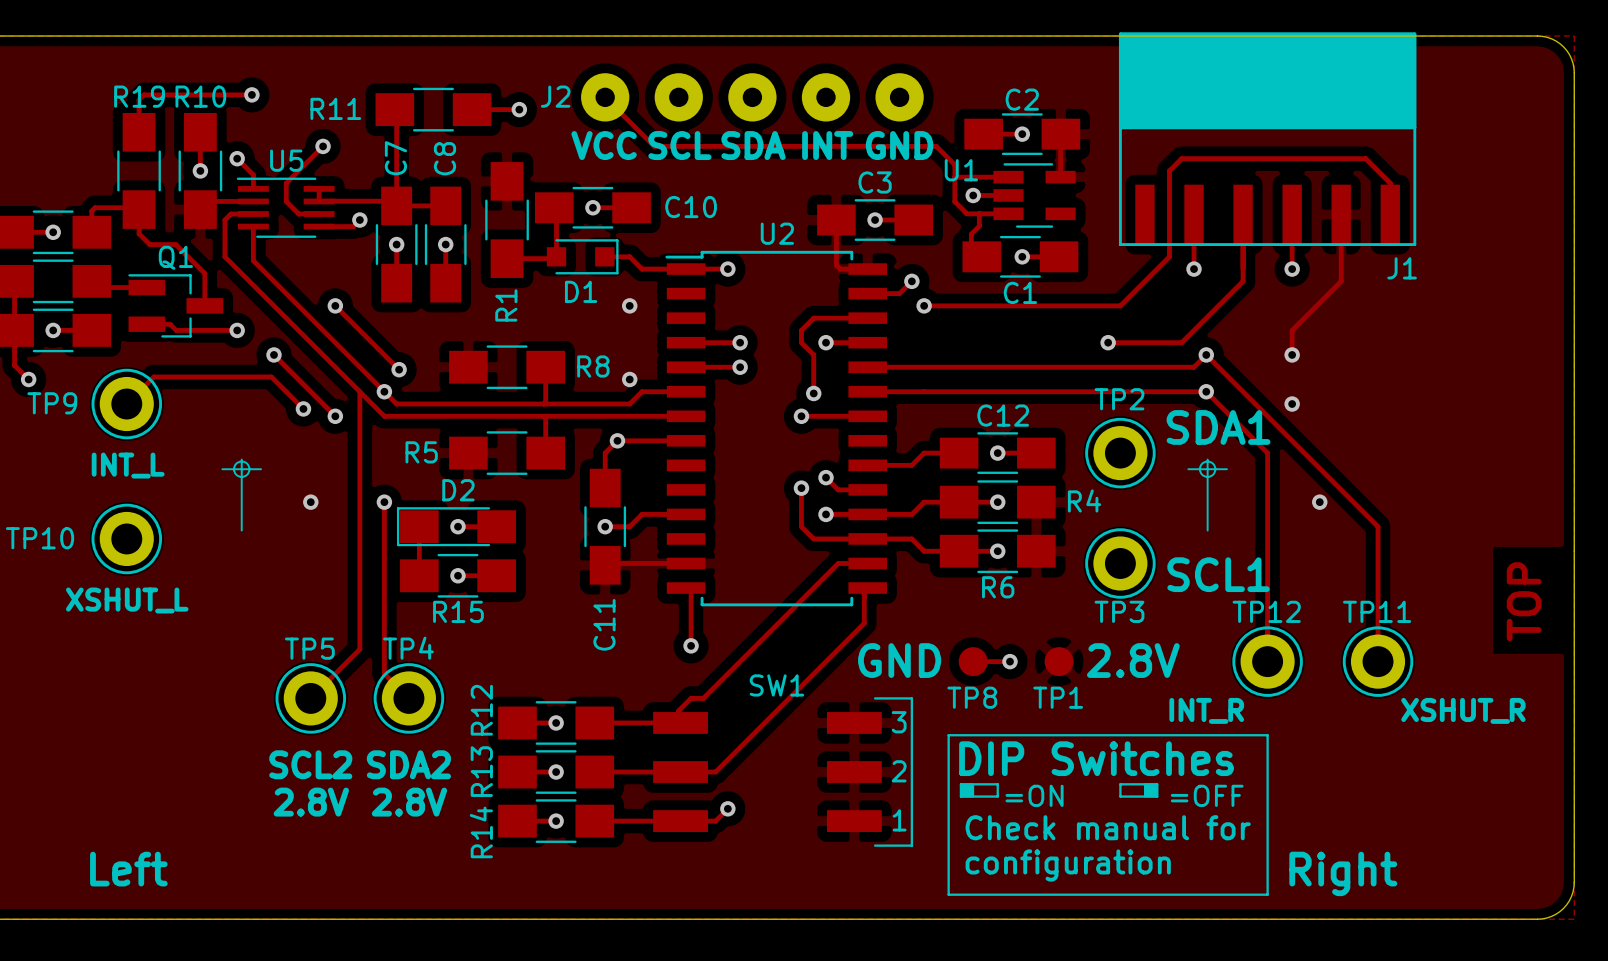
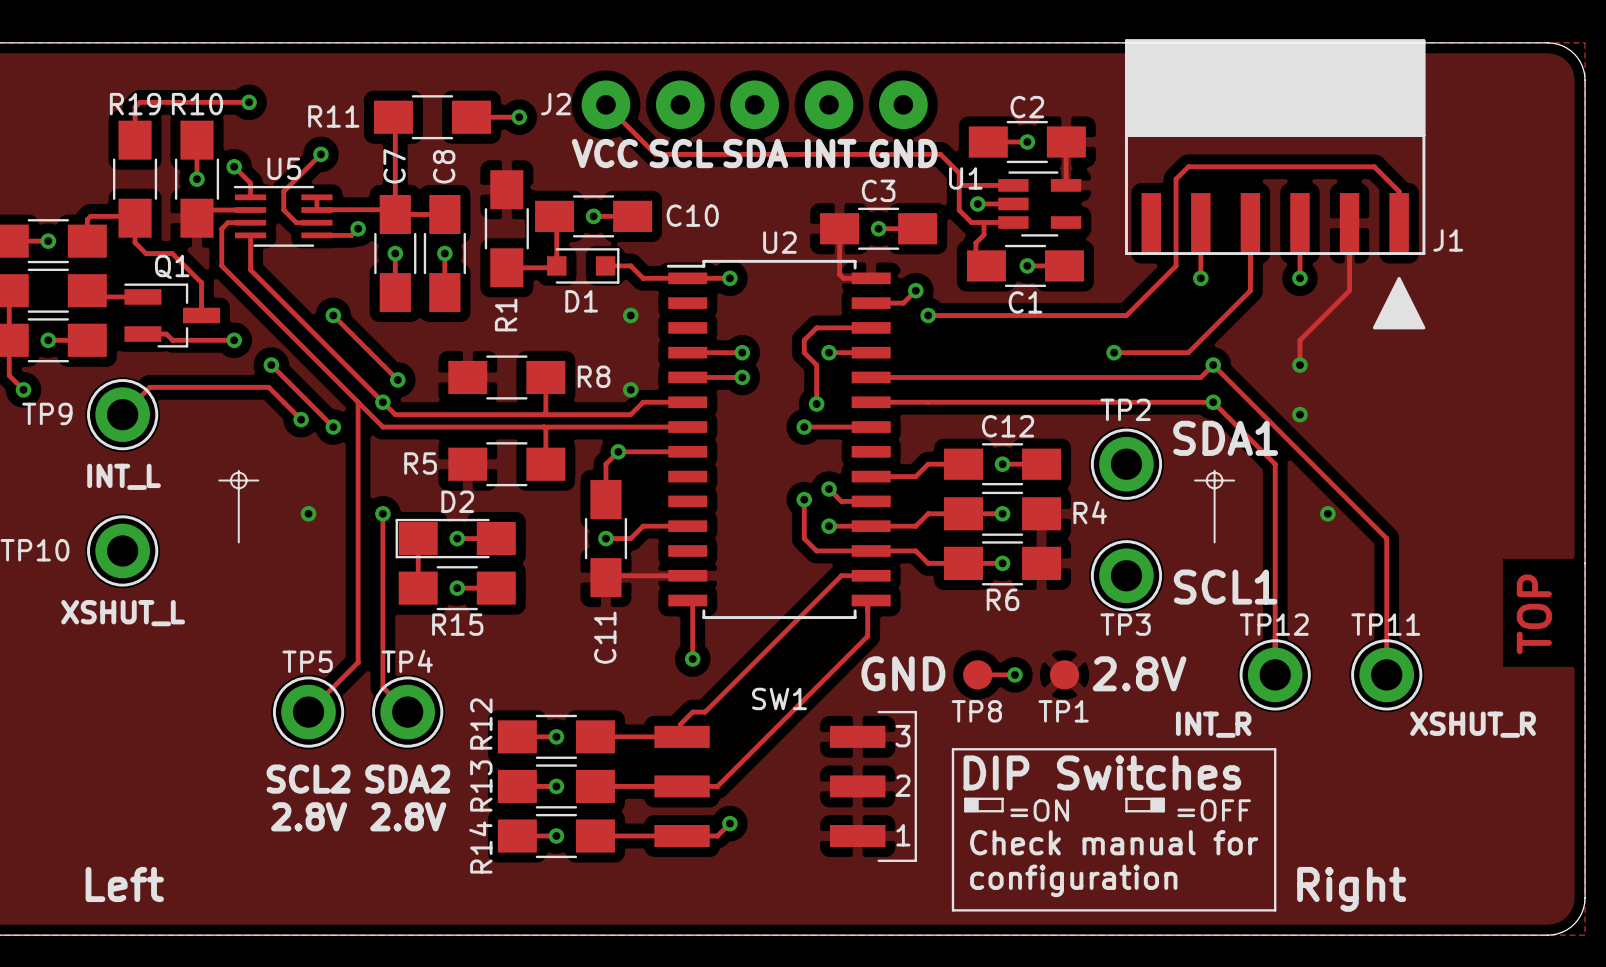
J1 footprint: [1118, 32, 1417, 247] -> [1125, 39, 1426, 330]
J1 name position: J1 (1402, 268) -> J1 (1448, 240)

